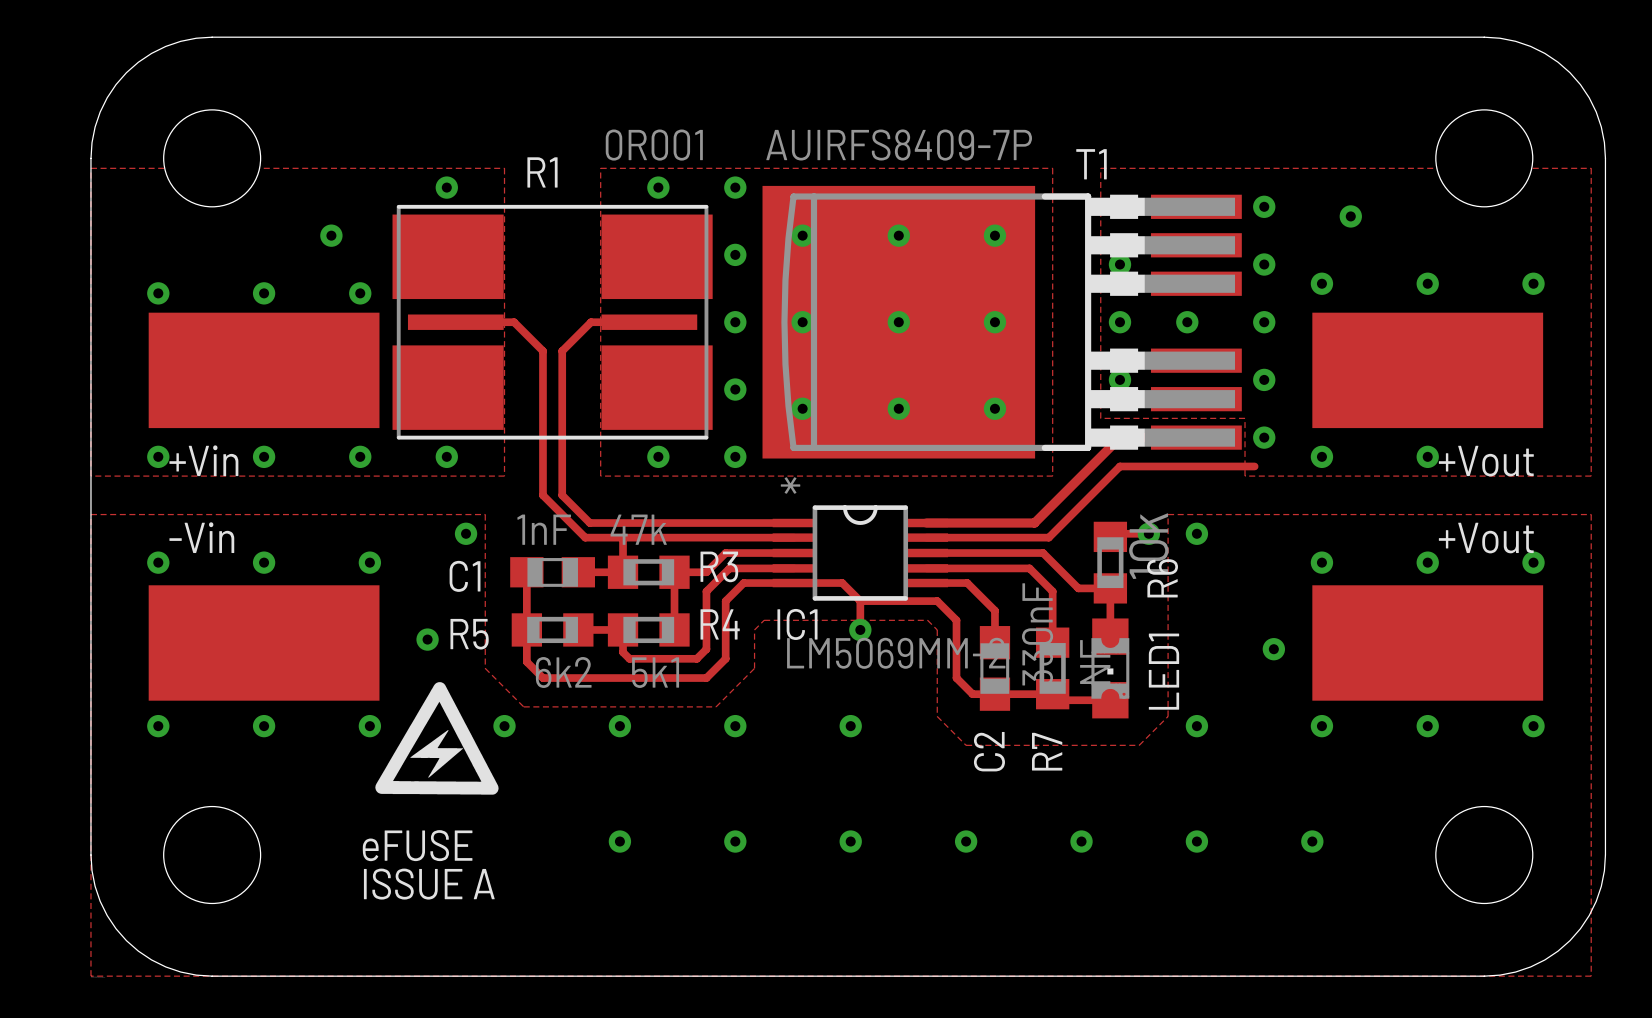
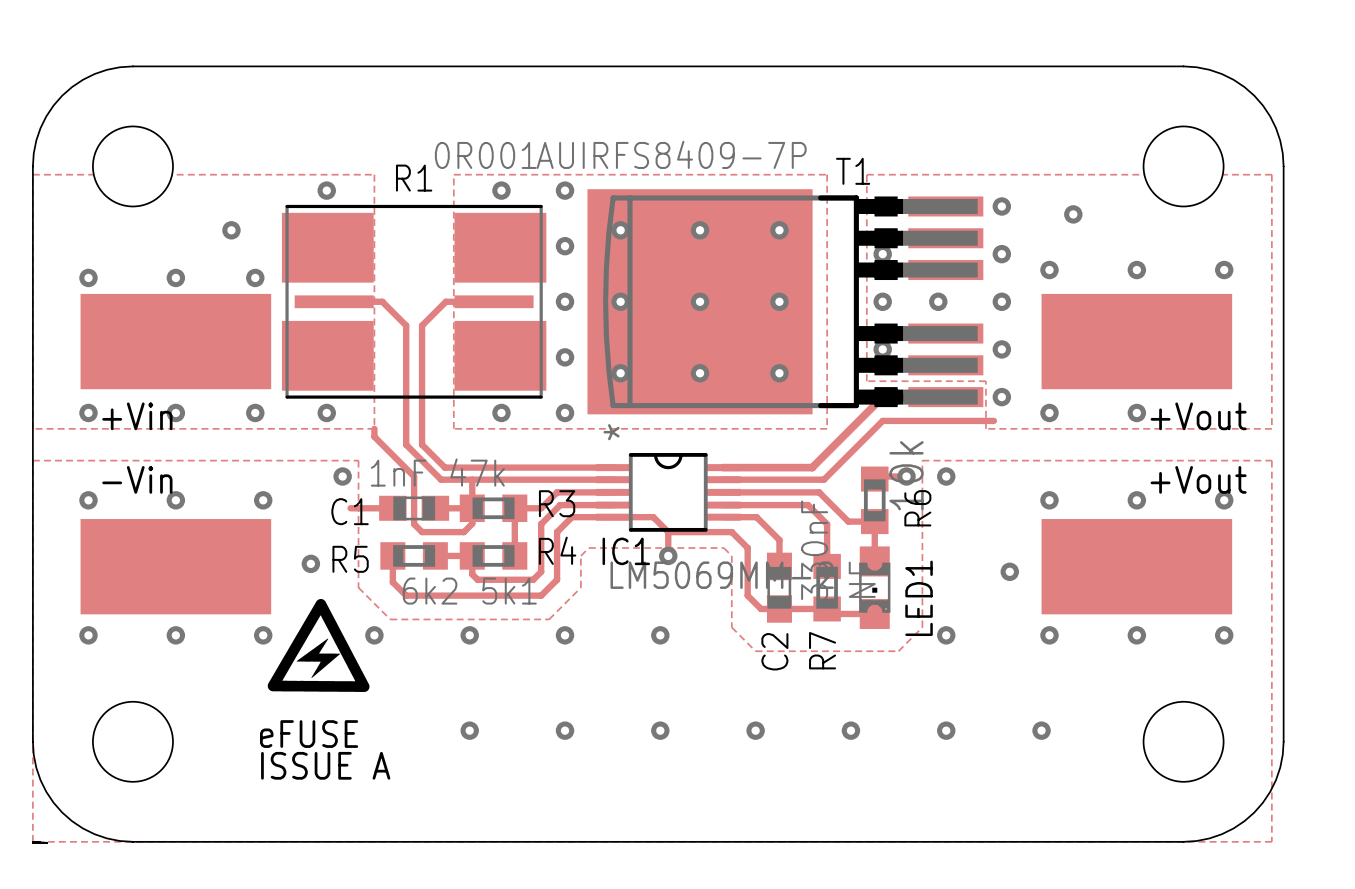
track: none -> (374, 428) (374, 436) (414, 476) (414, 524) (422, 532) (463, 532) (472, 523) (472, 508)
track: (526, 572) (526, 629) -> (392, 508) (350, 508)

